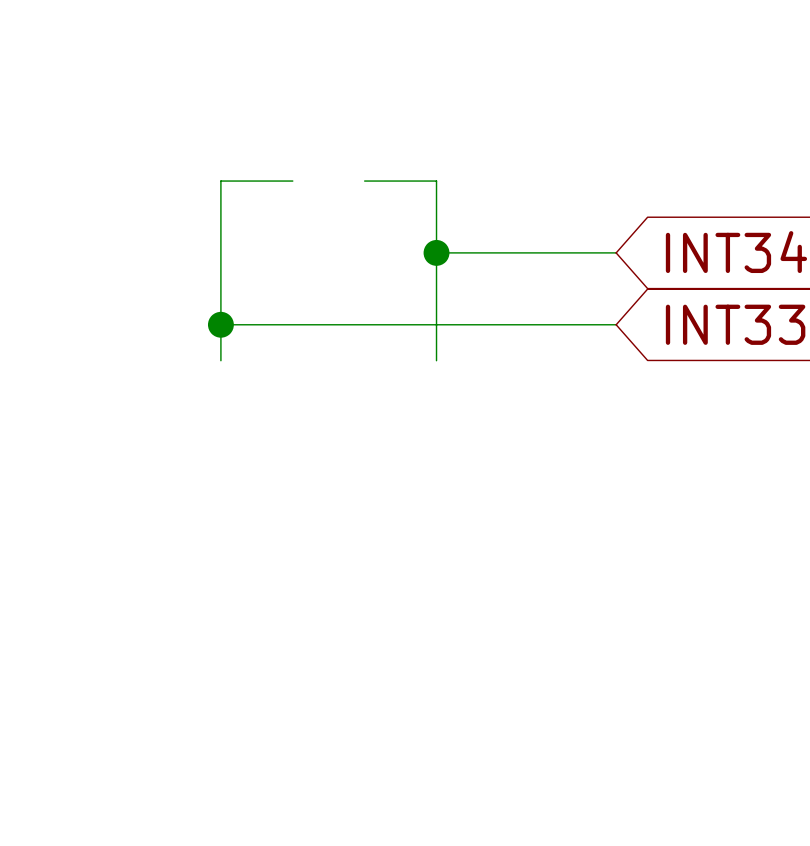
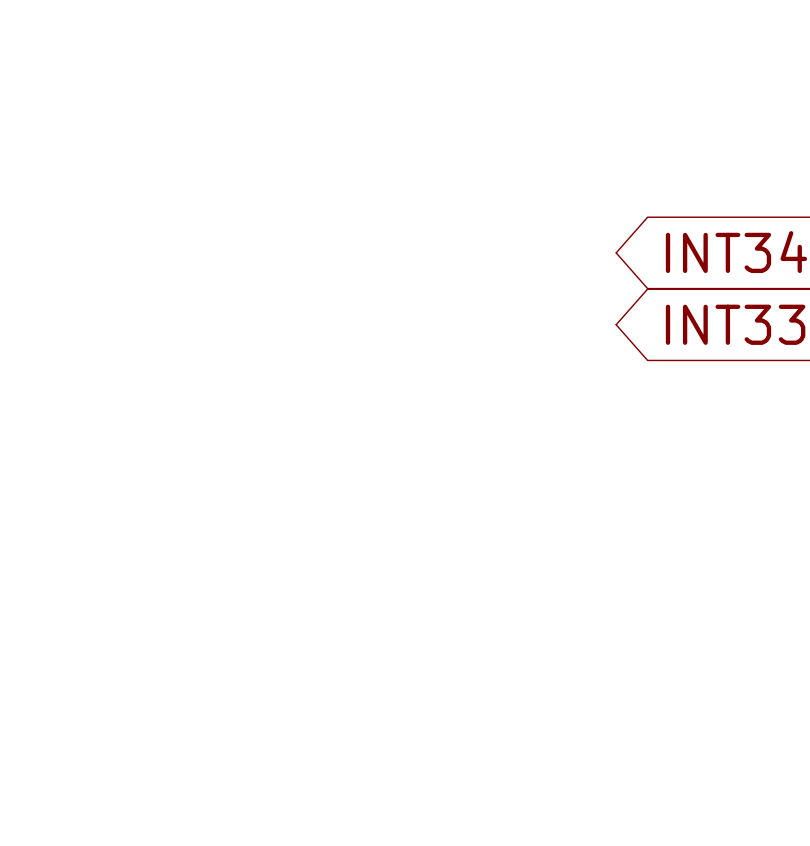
wire: (292, 181) (220, 181) (220, 360) -> none
wire: (364, 181) (436, 181) (436, 360) -> none
wire: (436, 252) (616, 252) -> none
junction: (436, 252) -> none
wire: (220, 324) (616, 324) -> none
junction: (220, 324) -> none

